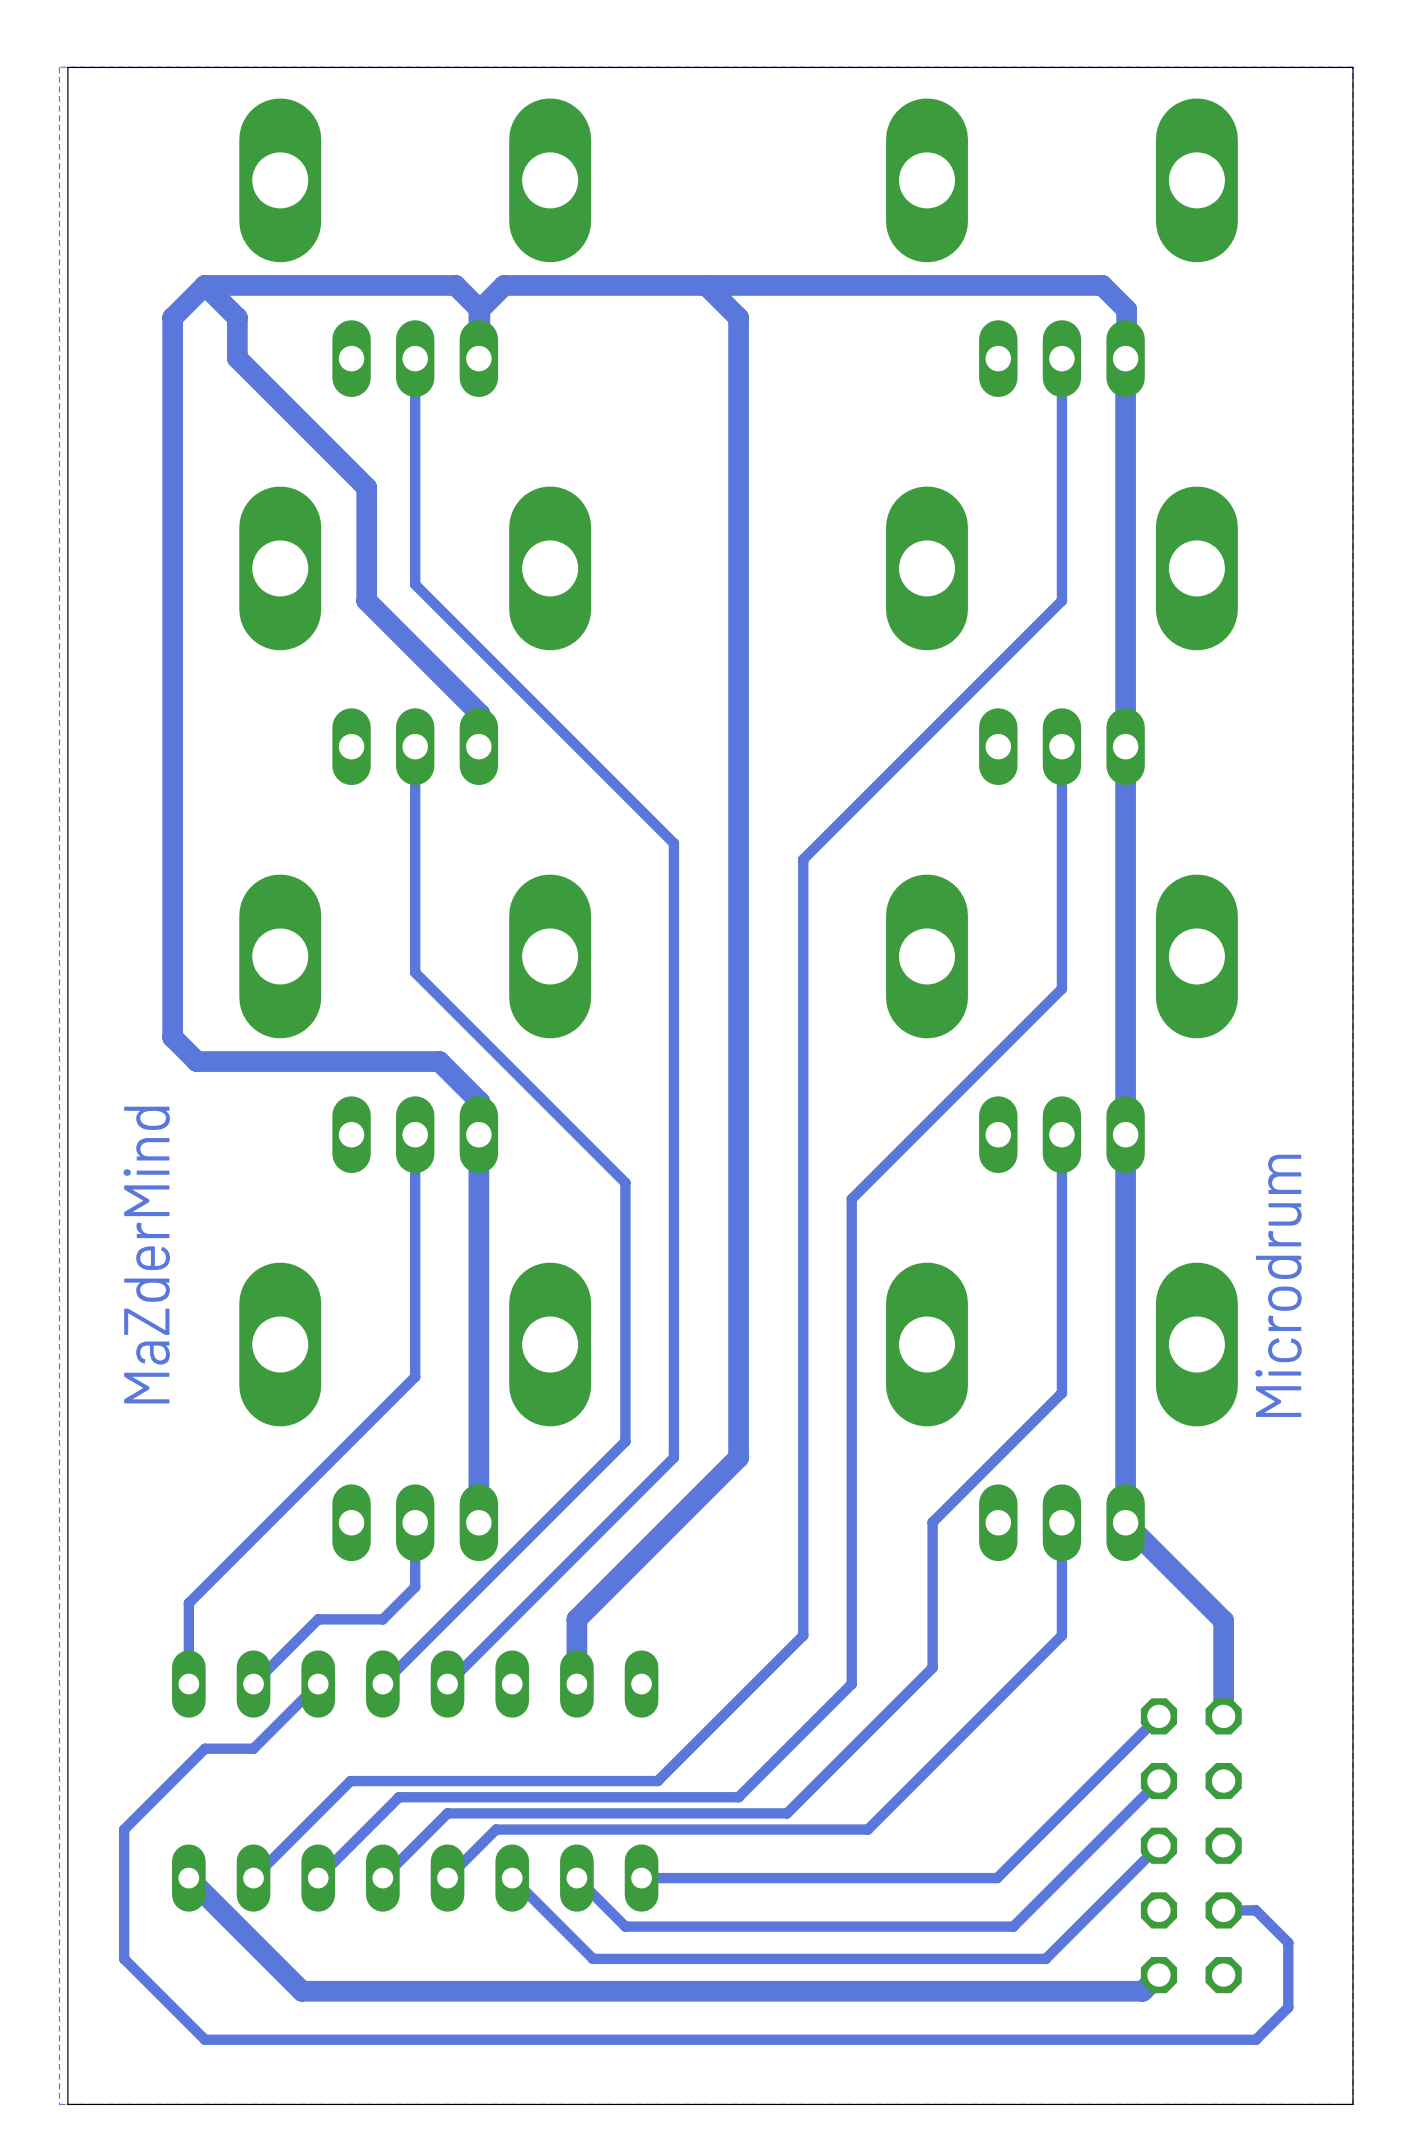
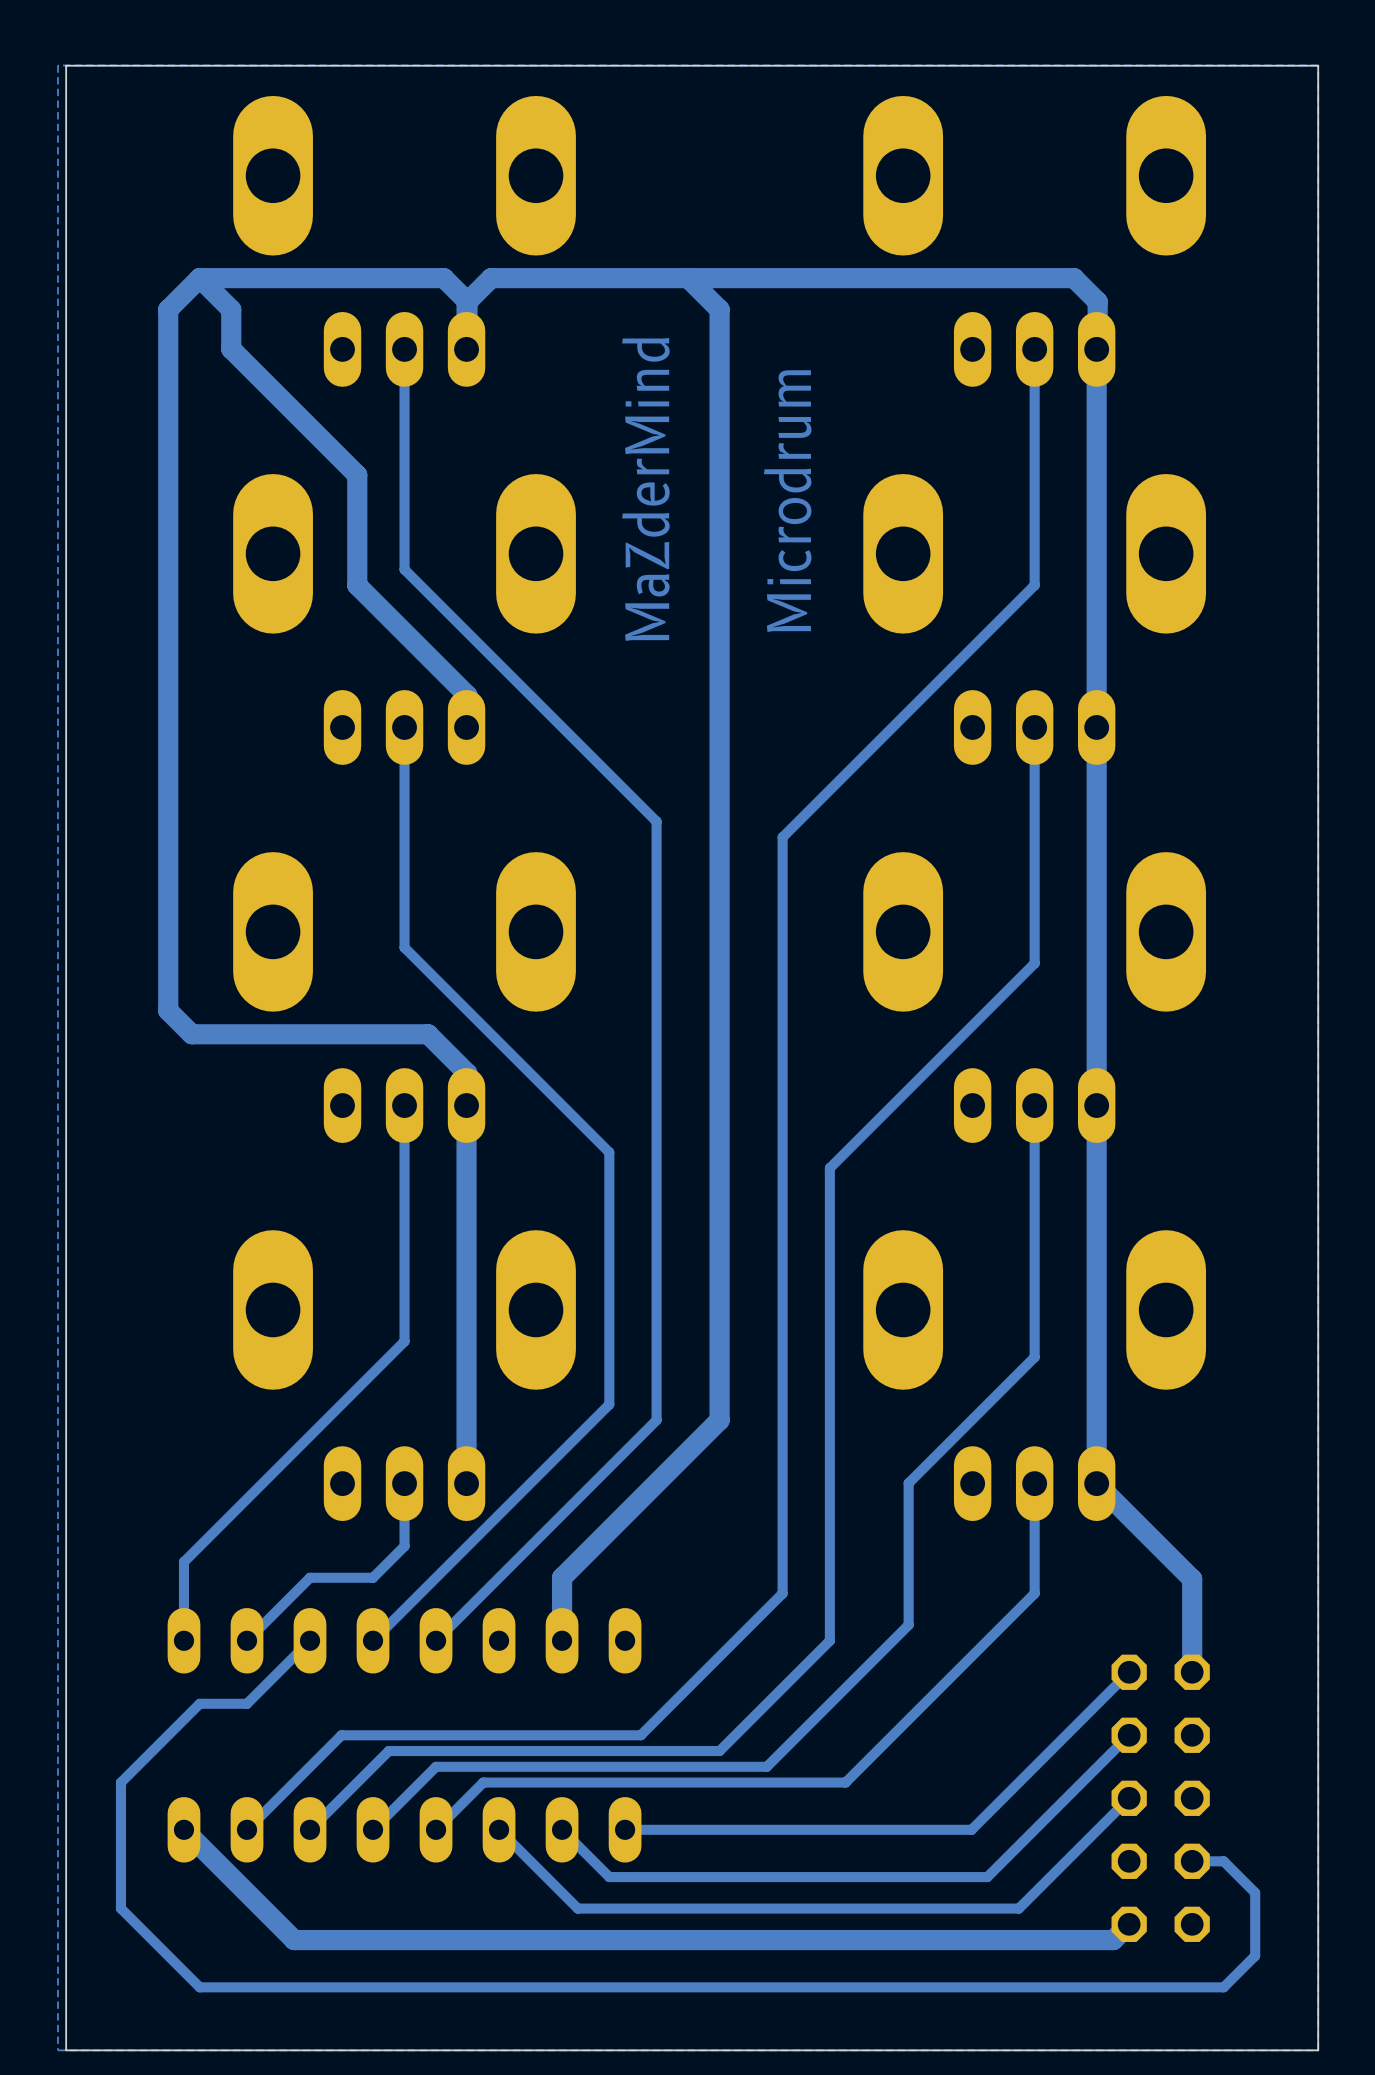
text: none -> MaZderMind (645, 489)
text: none -> Microdrum (787, 501)
text: MaZderMind (146, 1255) -> none
text: Microdrum (1278, 1285) -> none

